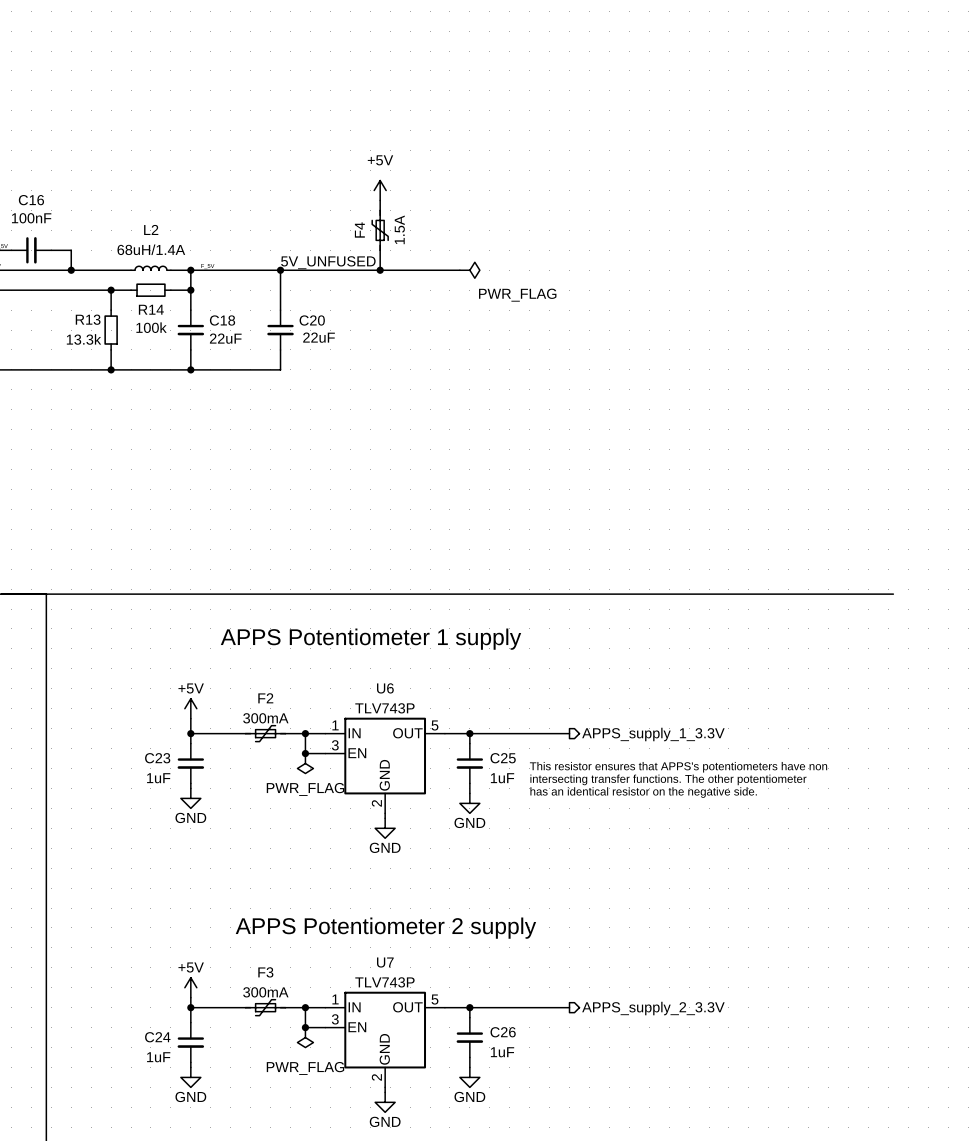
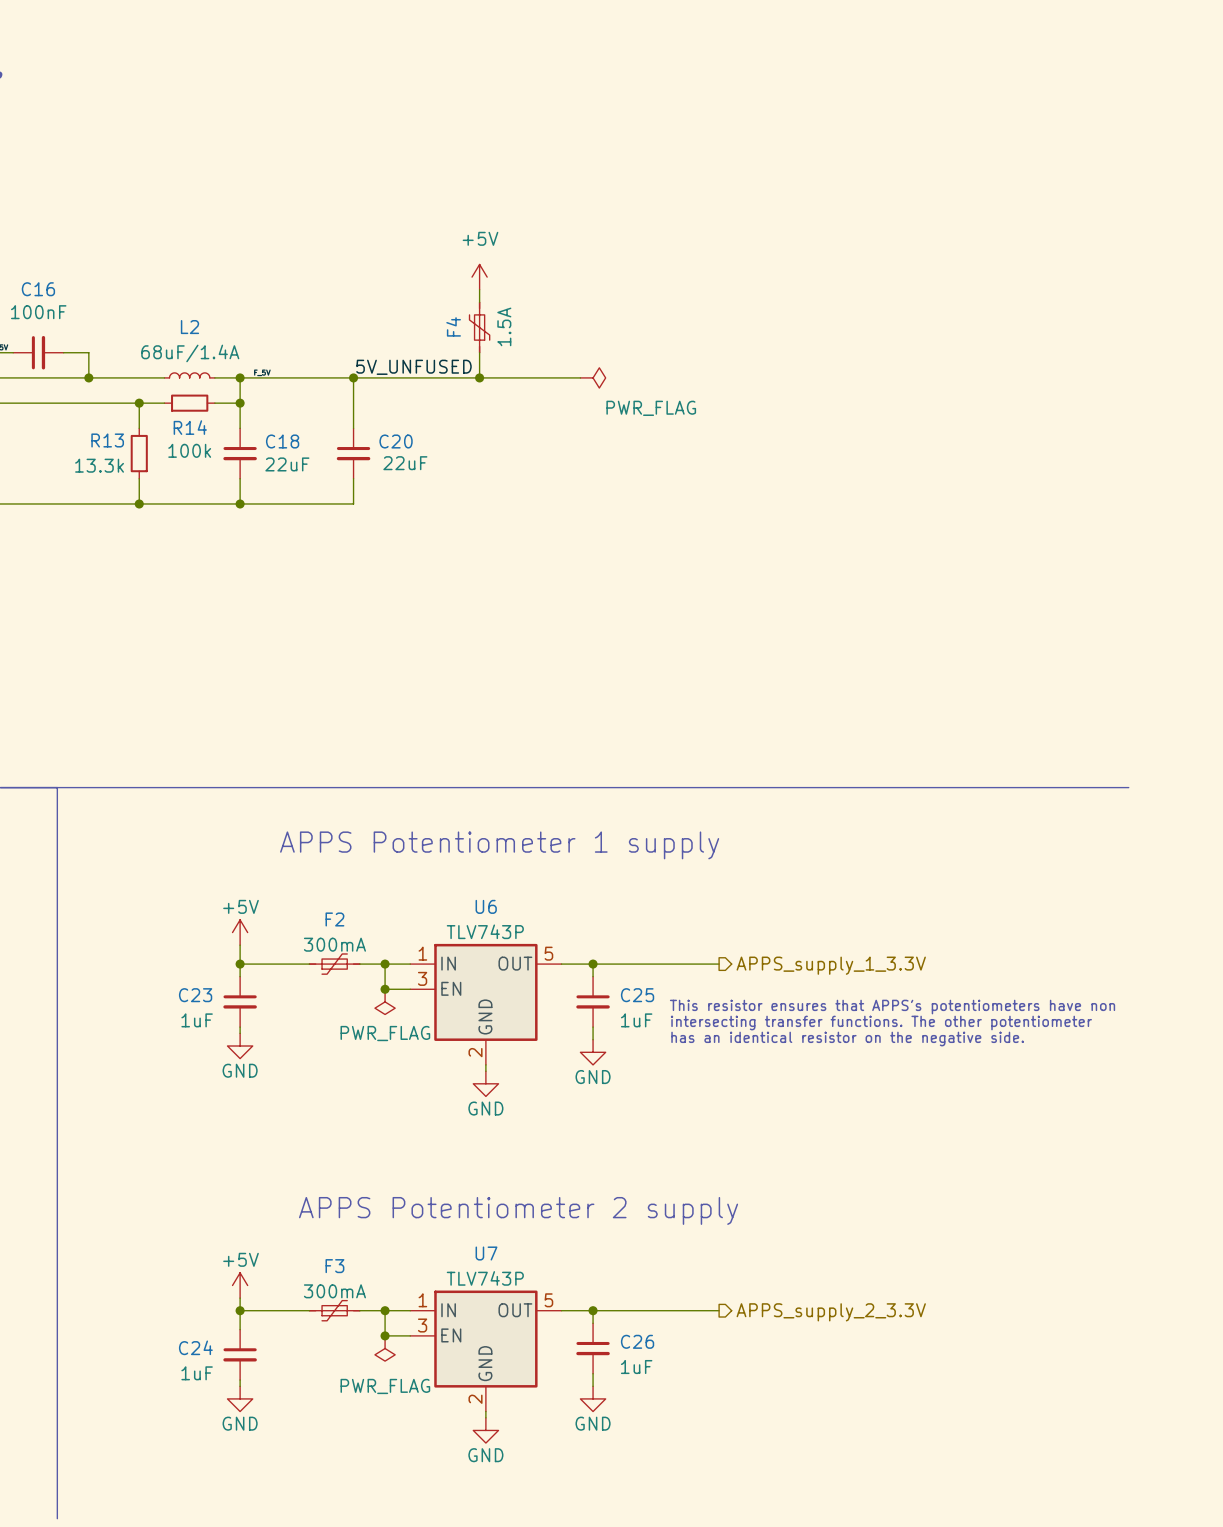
L2 value: 68uH/1.4A (151, 249) -> 68uF/1.4A (190, 353)

